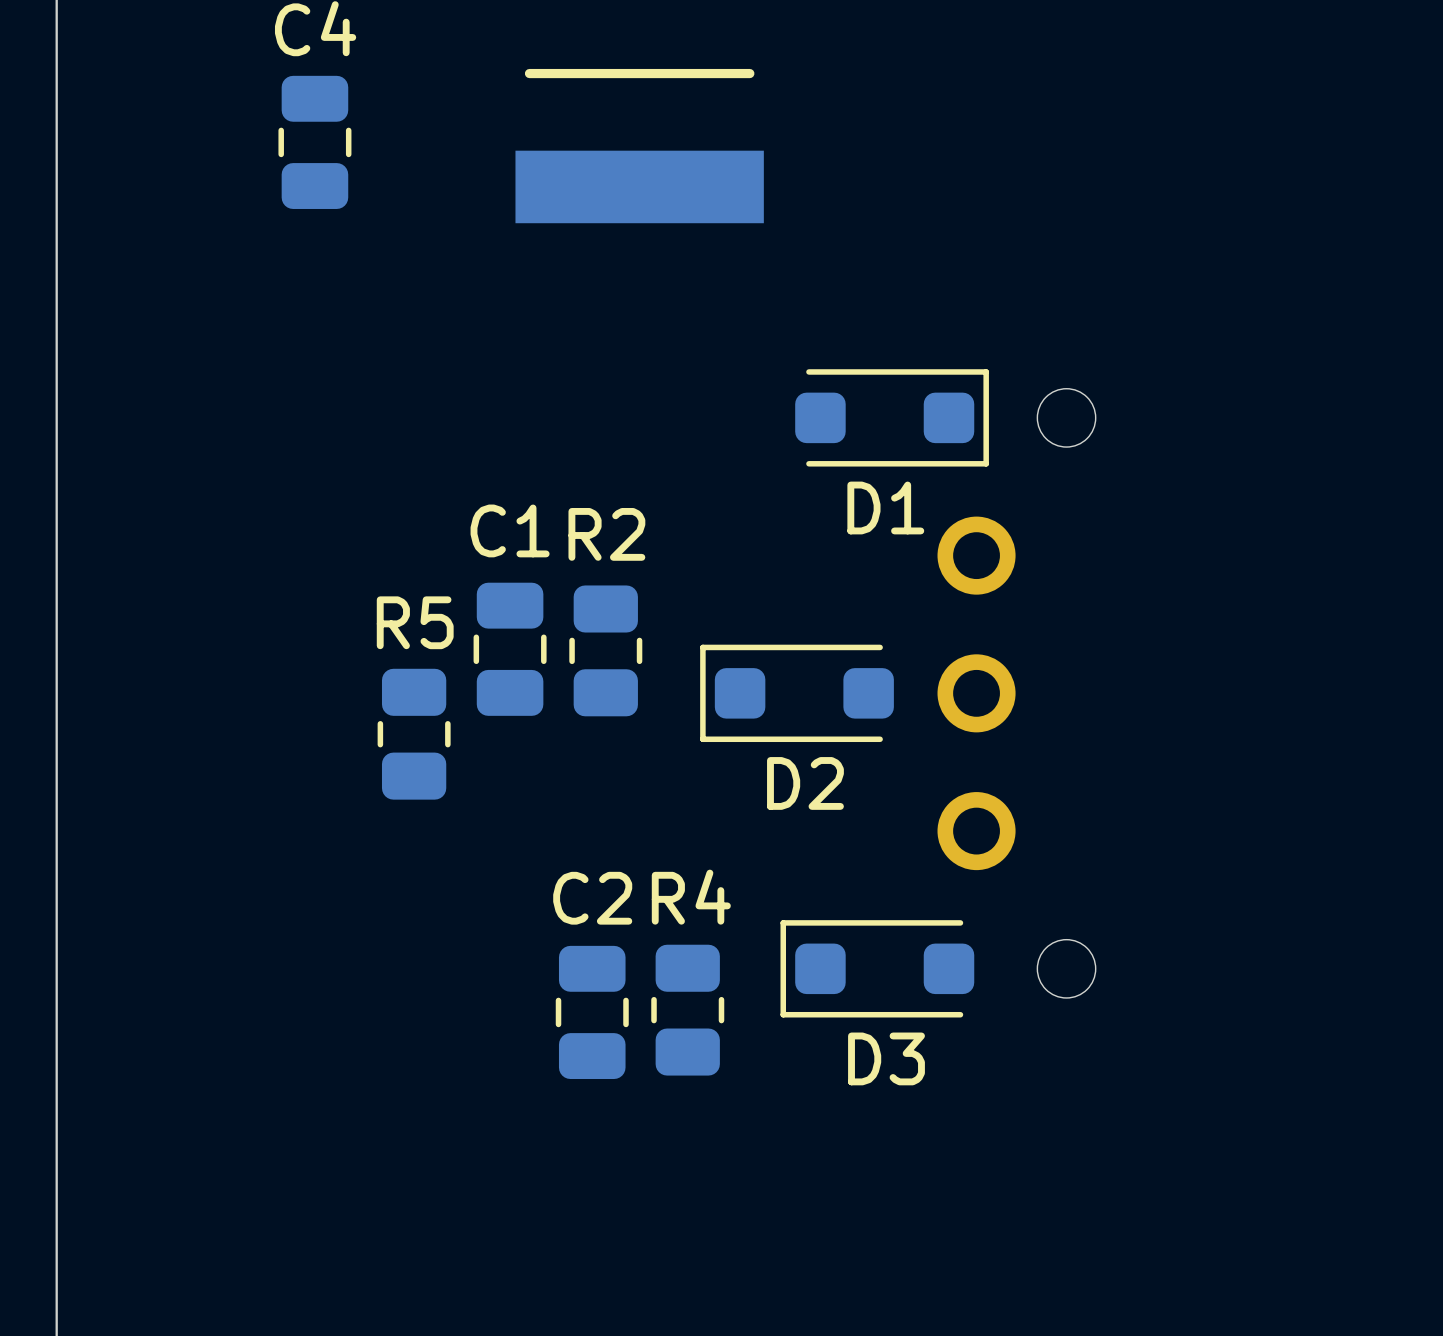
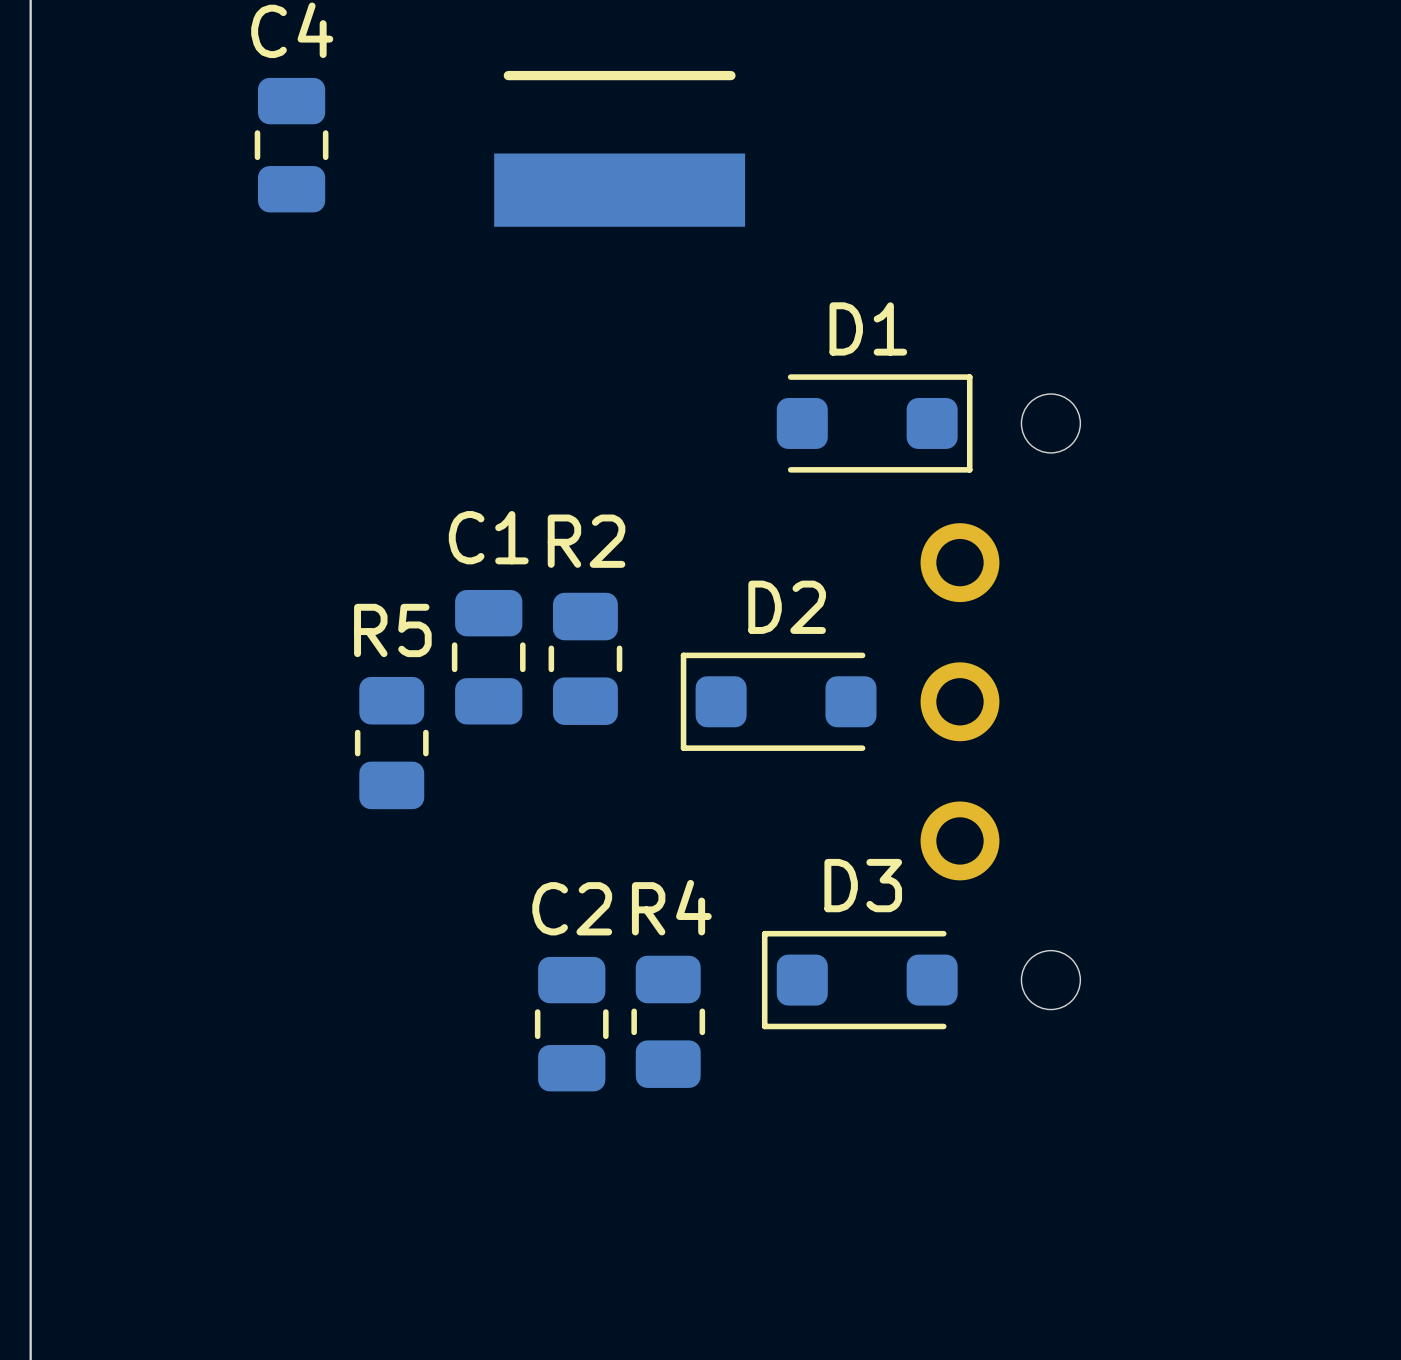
D1 name position: D1 (885, 507) -> D1 (868, 328)
D2 name position: D2 (805, 783) -> D2 (787, 607)
D3 name position: D3 (886, 1058) -> D3 (863, 885)

